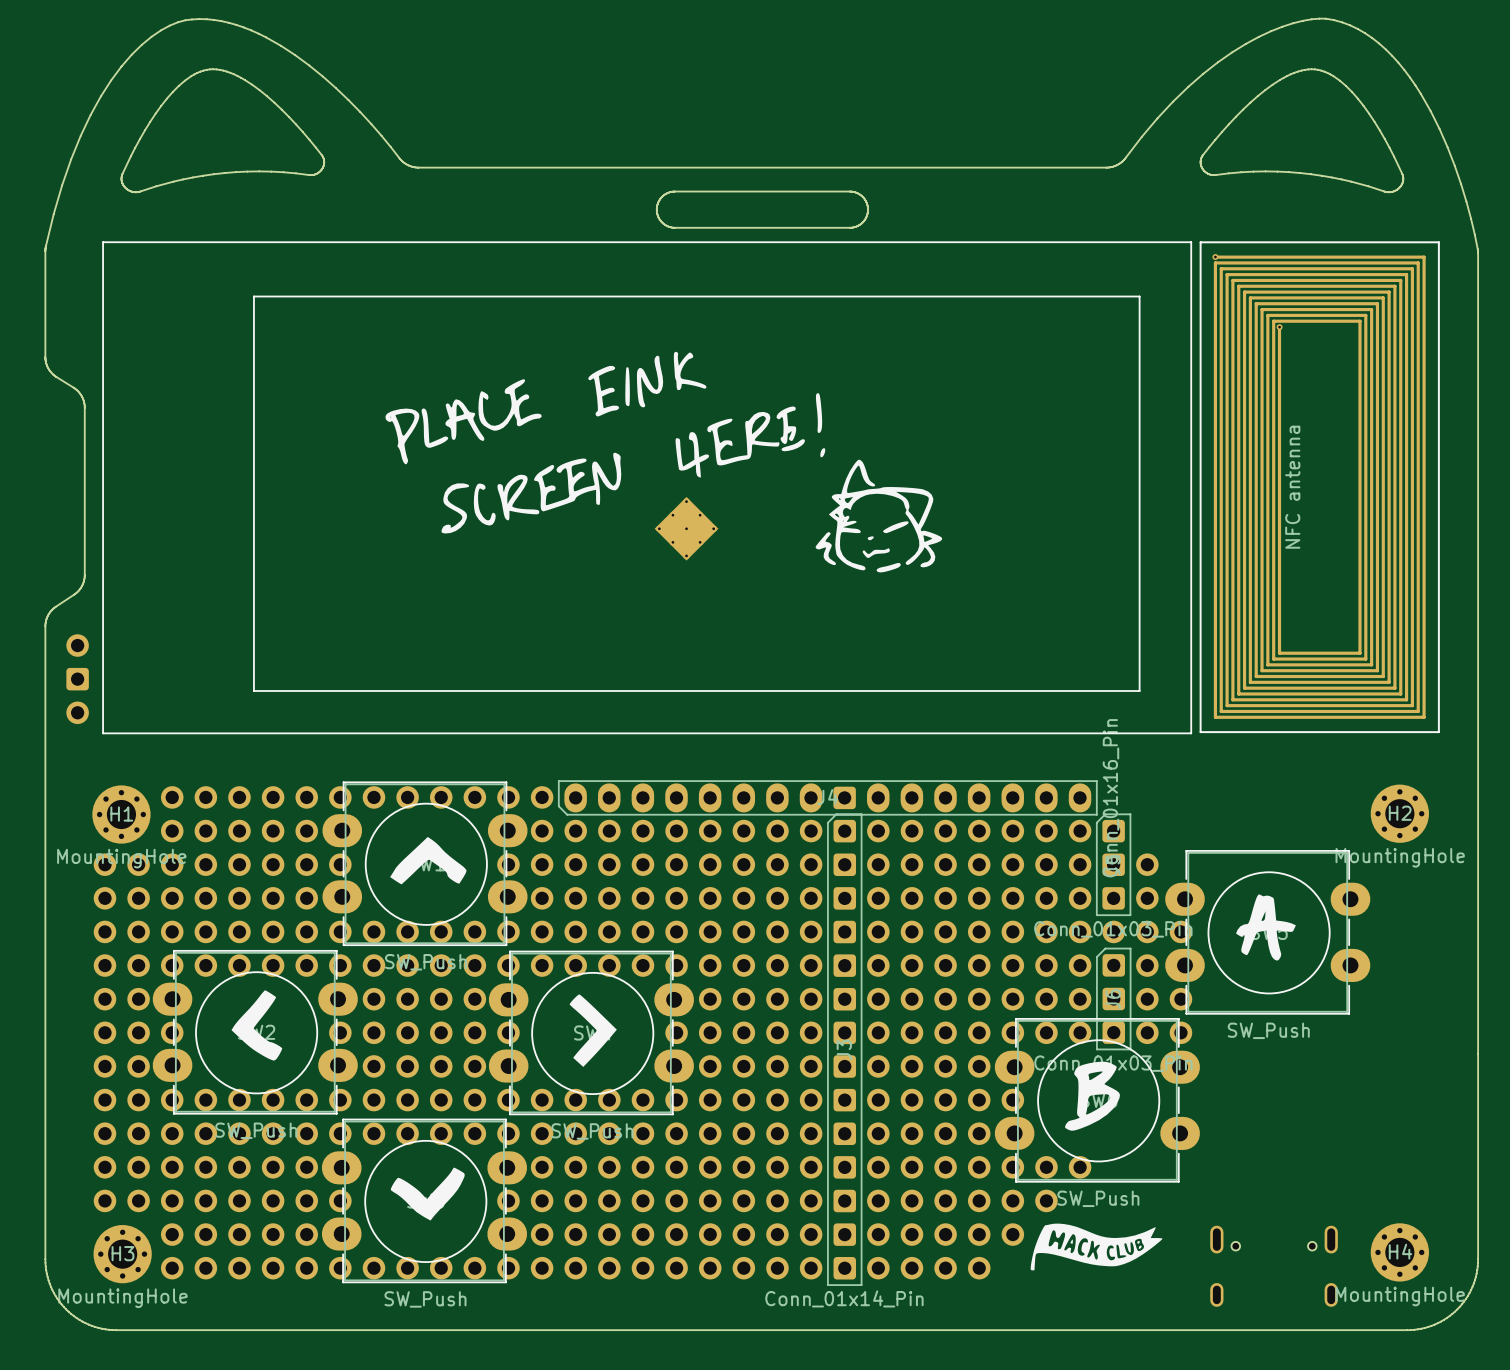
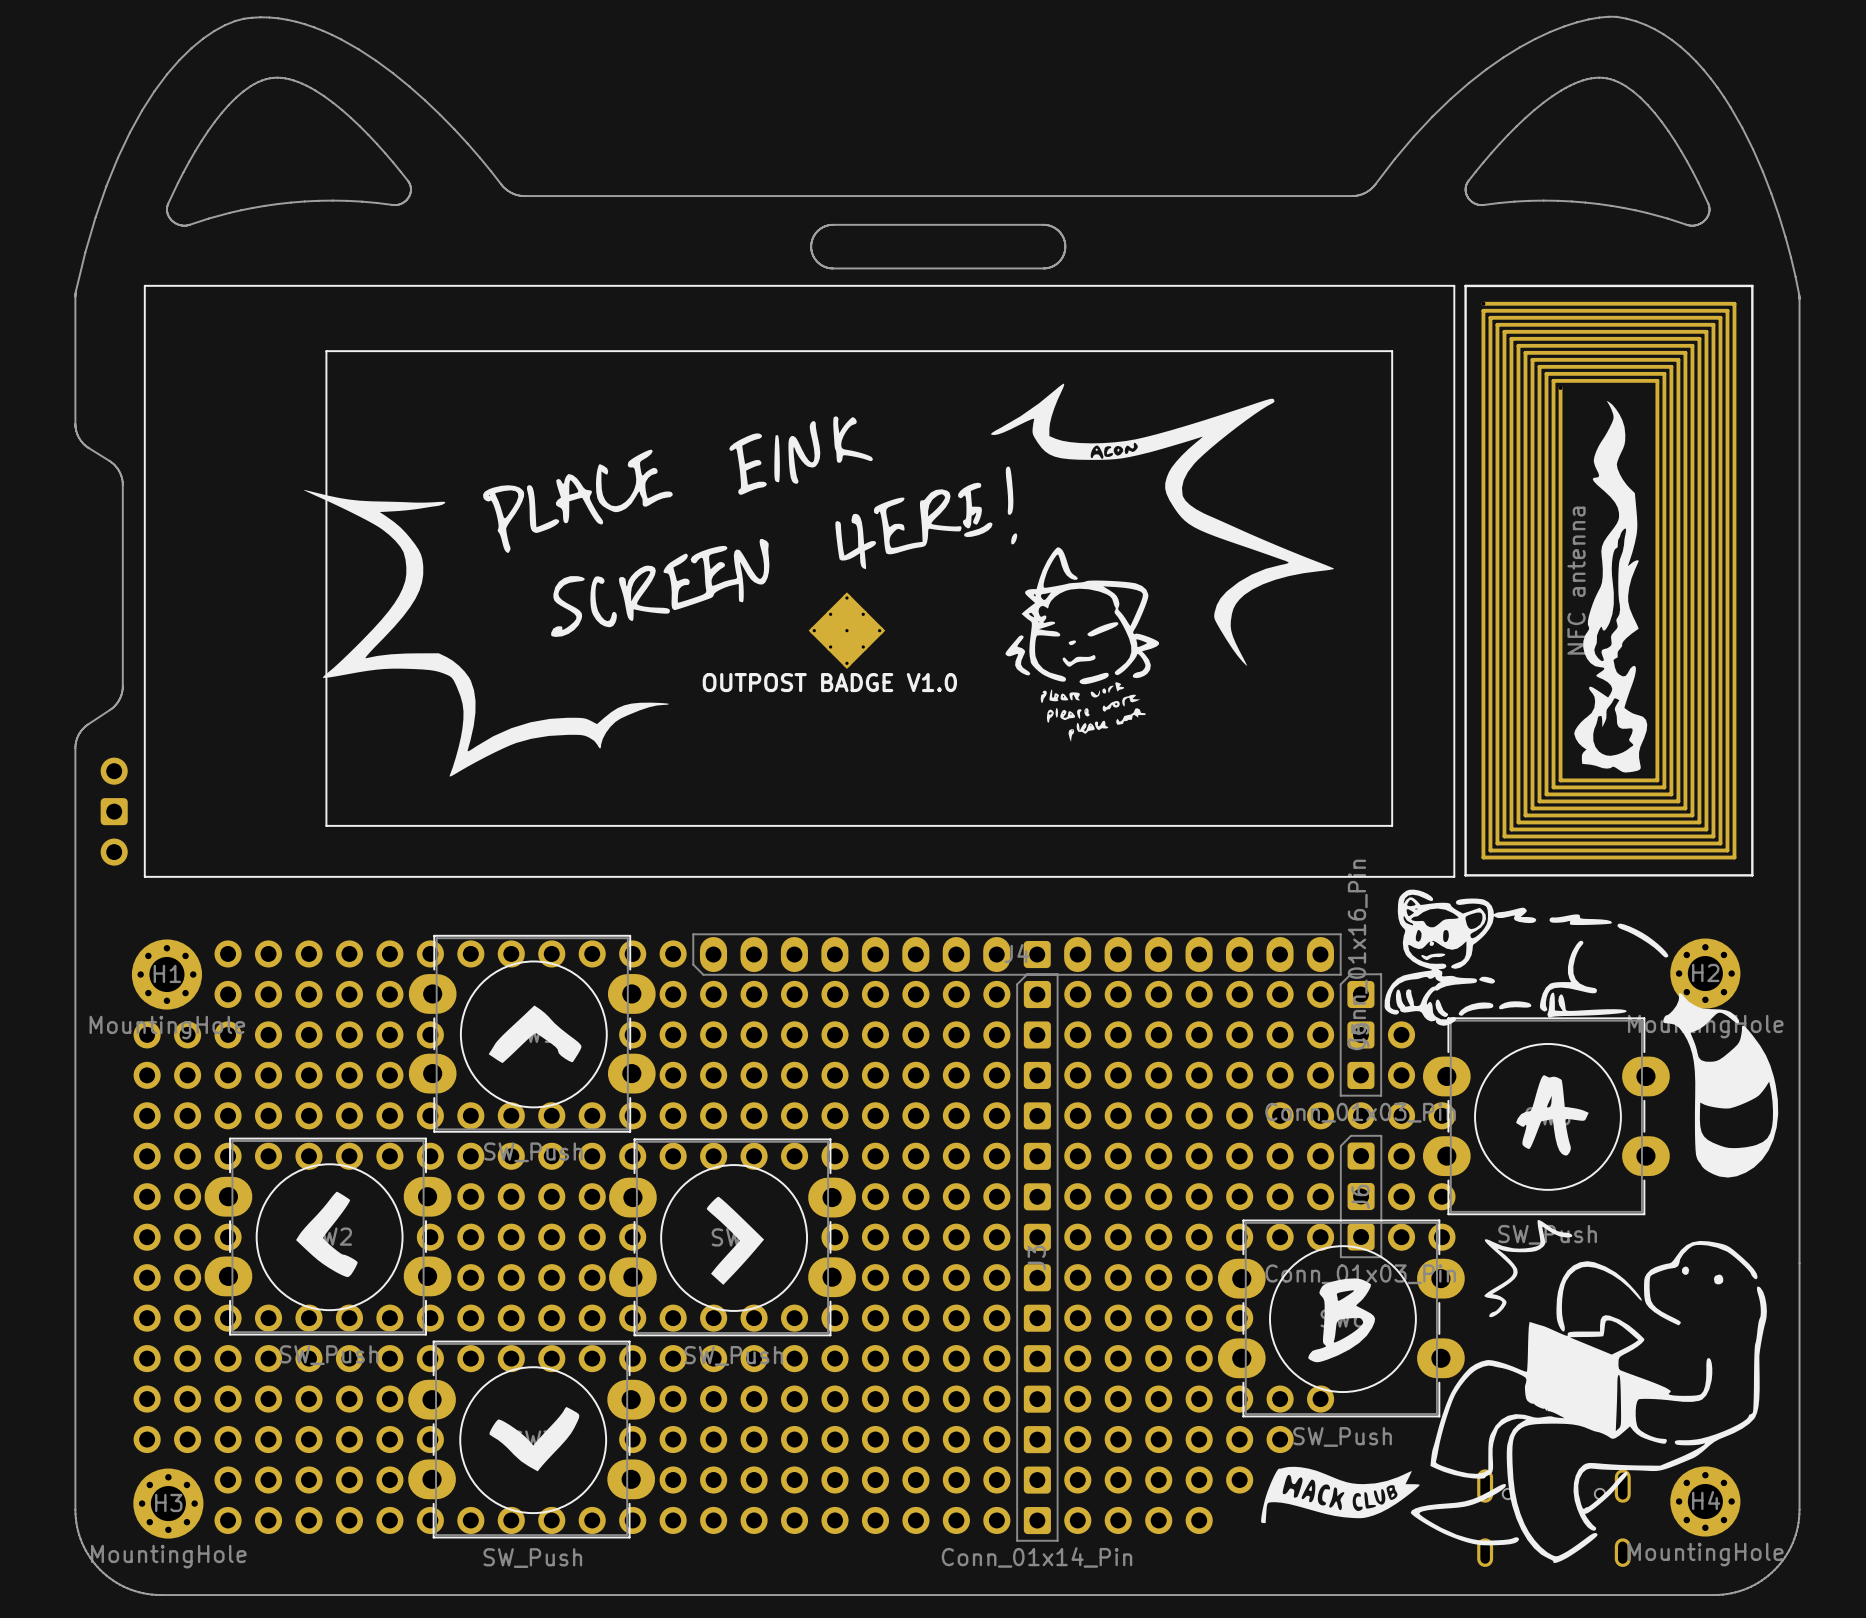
part footprint: [1199, 241, 1440, 734] -> [1464, 284, 1754, 877]
drawing: none -> [296, 383, 1779, 1563]
drawing: [231, 351, 1296, 1221] -> none
text: none -> OUTPOST BADGE V1.0 (829, 682)

